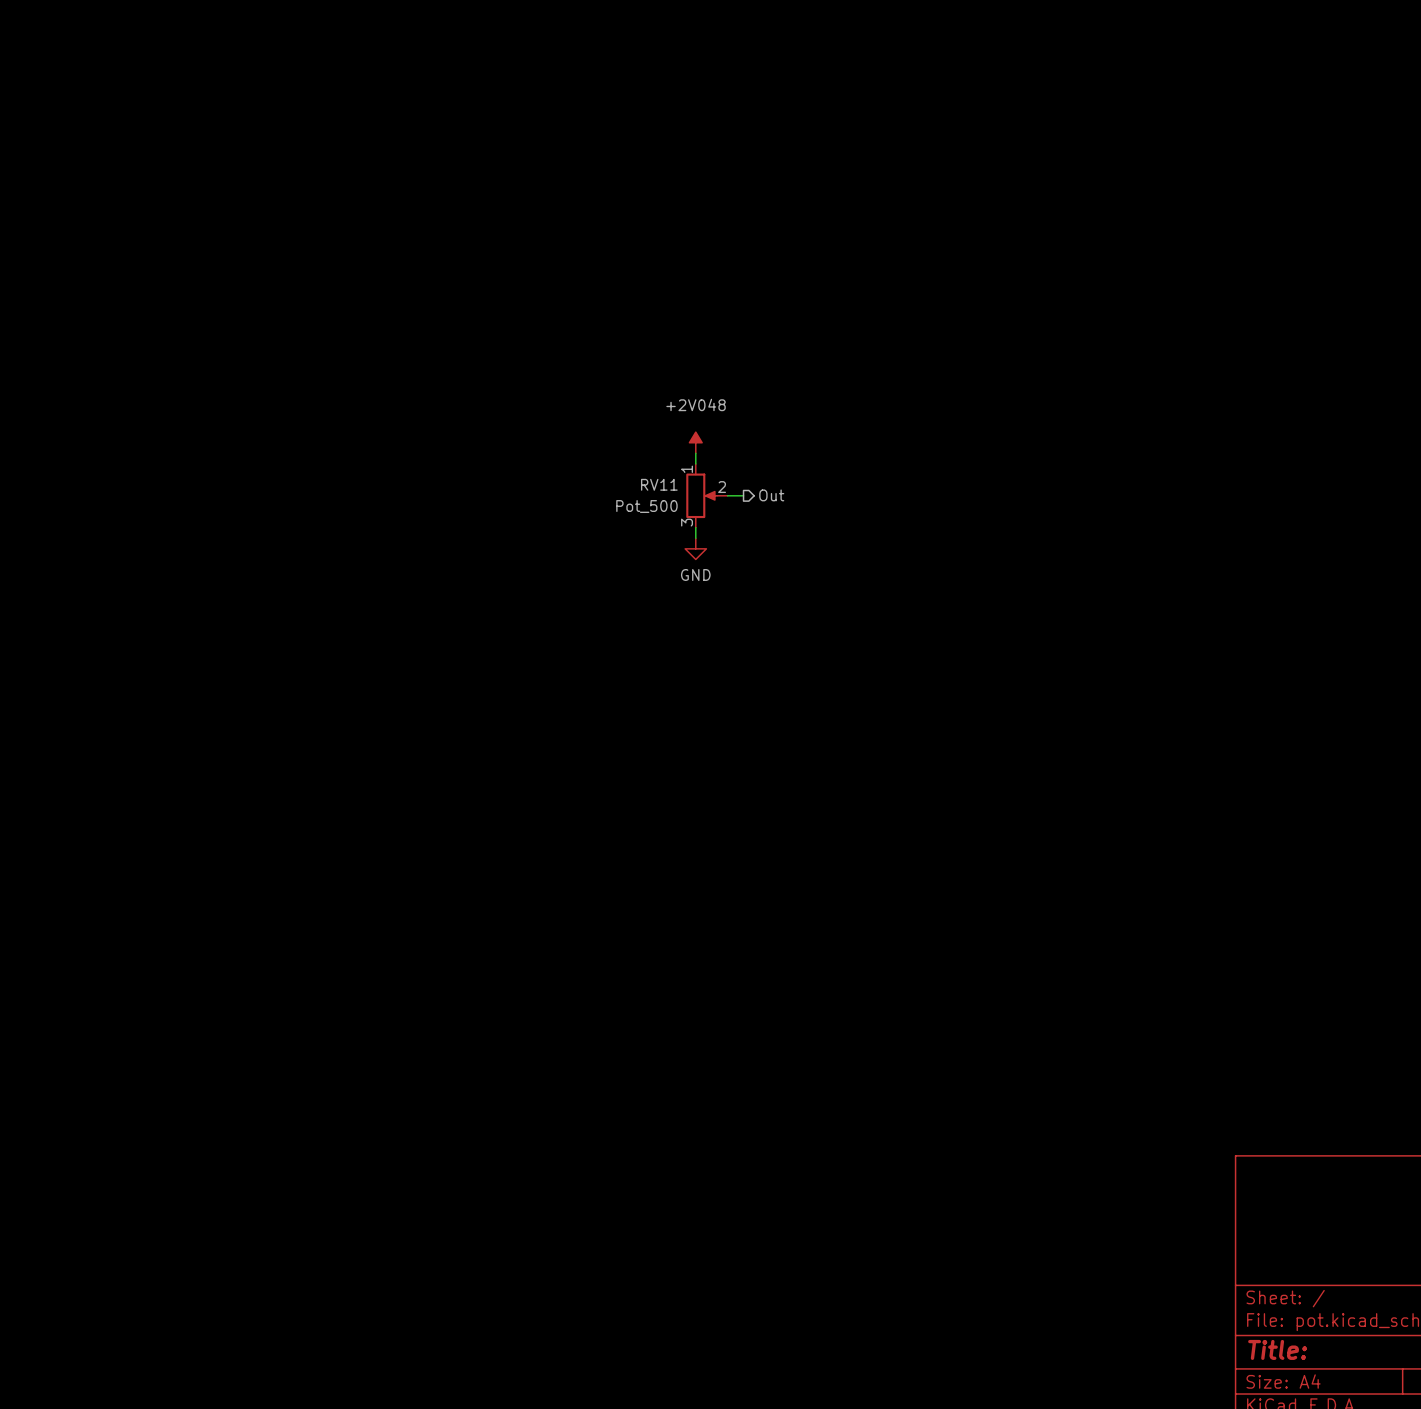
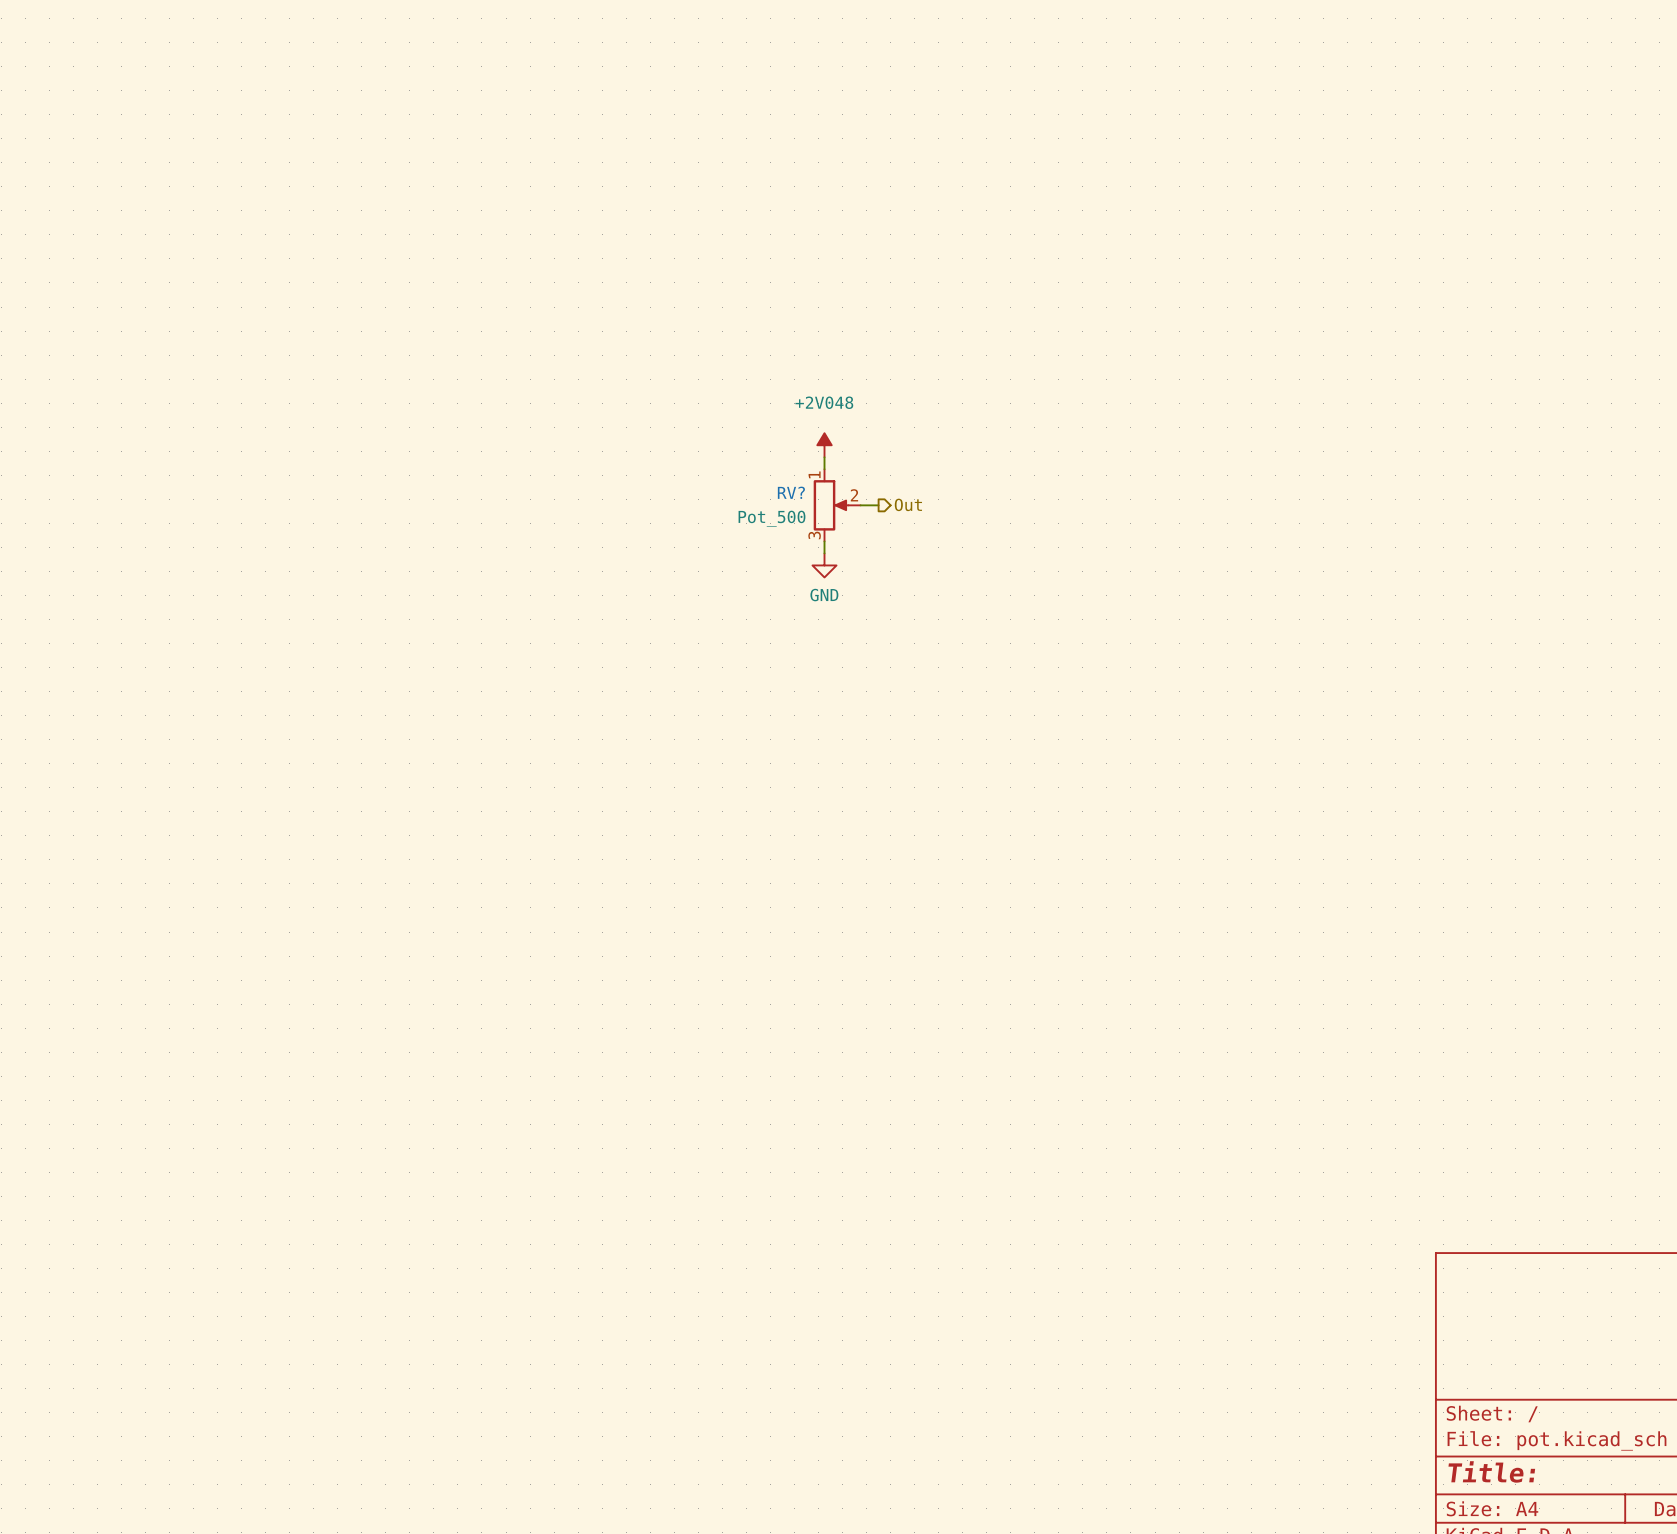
RV11 name: RV11 (659, 484) -> RV? (791, 492)

